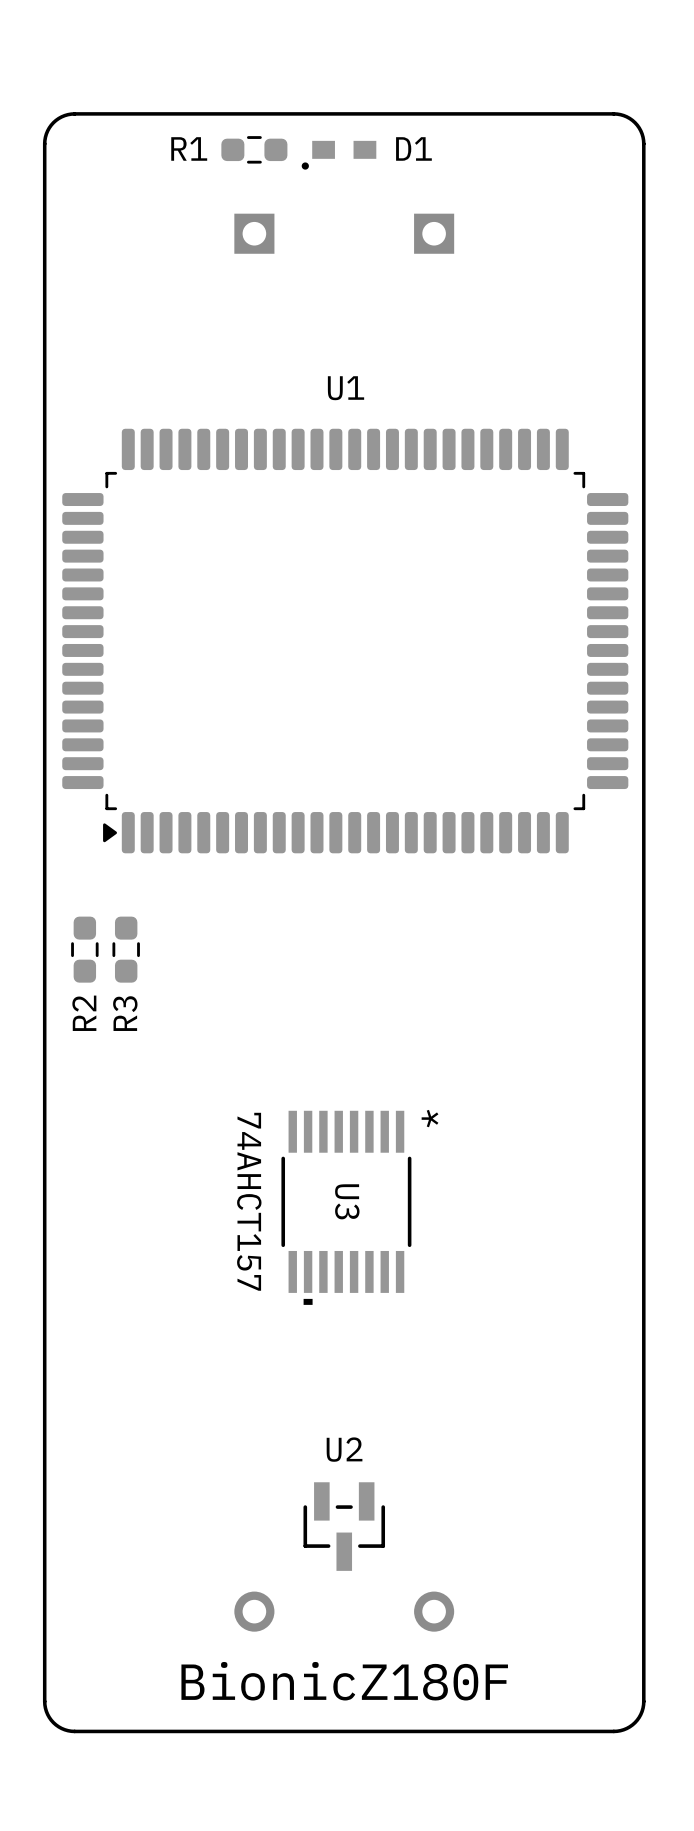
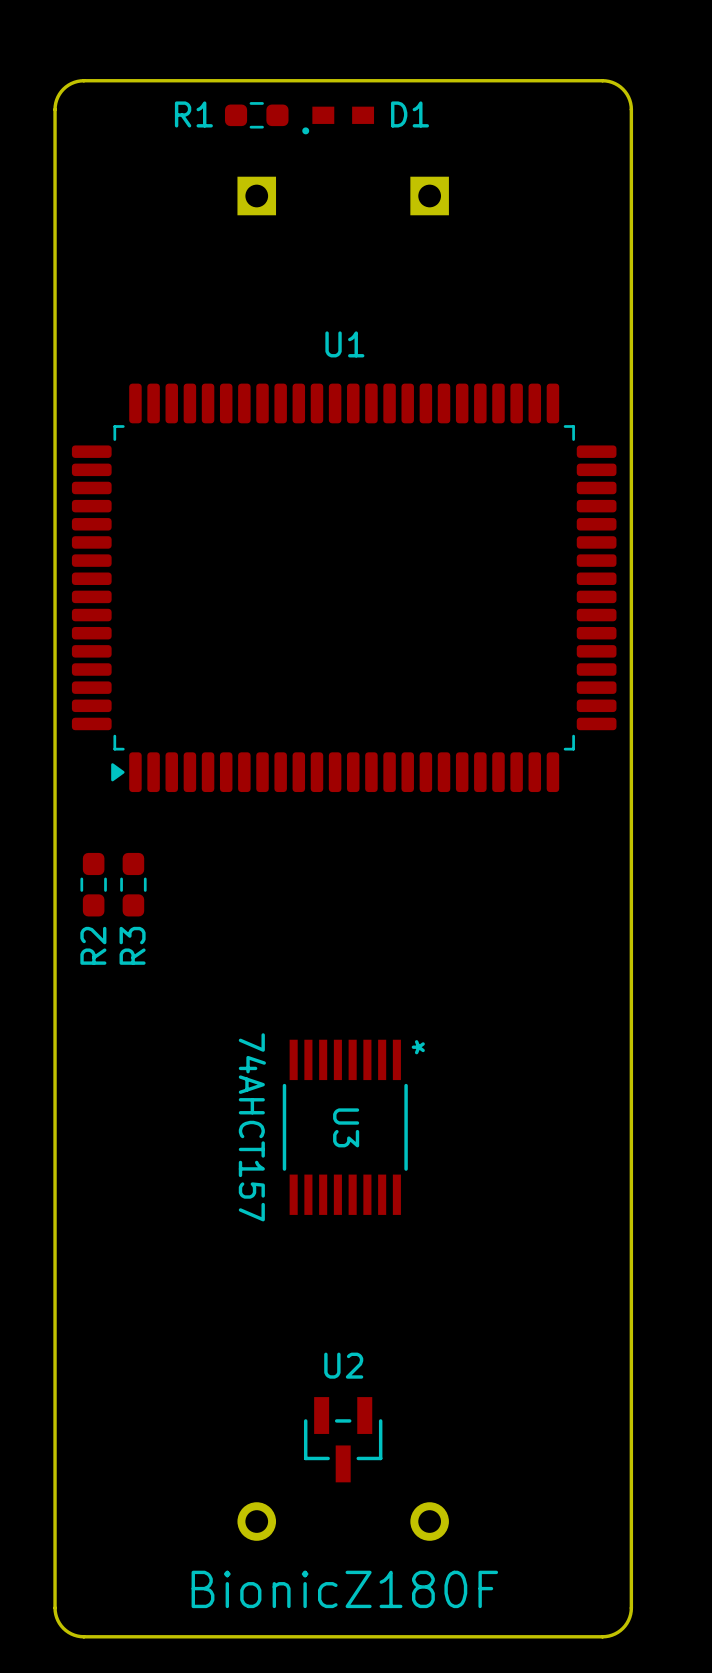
U3 footprint: [281, 1110, 412, 1305] -> [282, 1039, 408, 1215]

